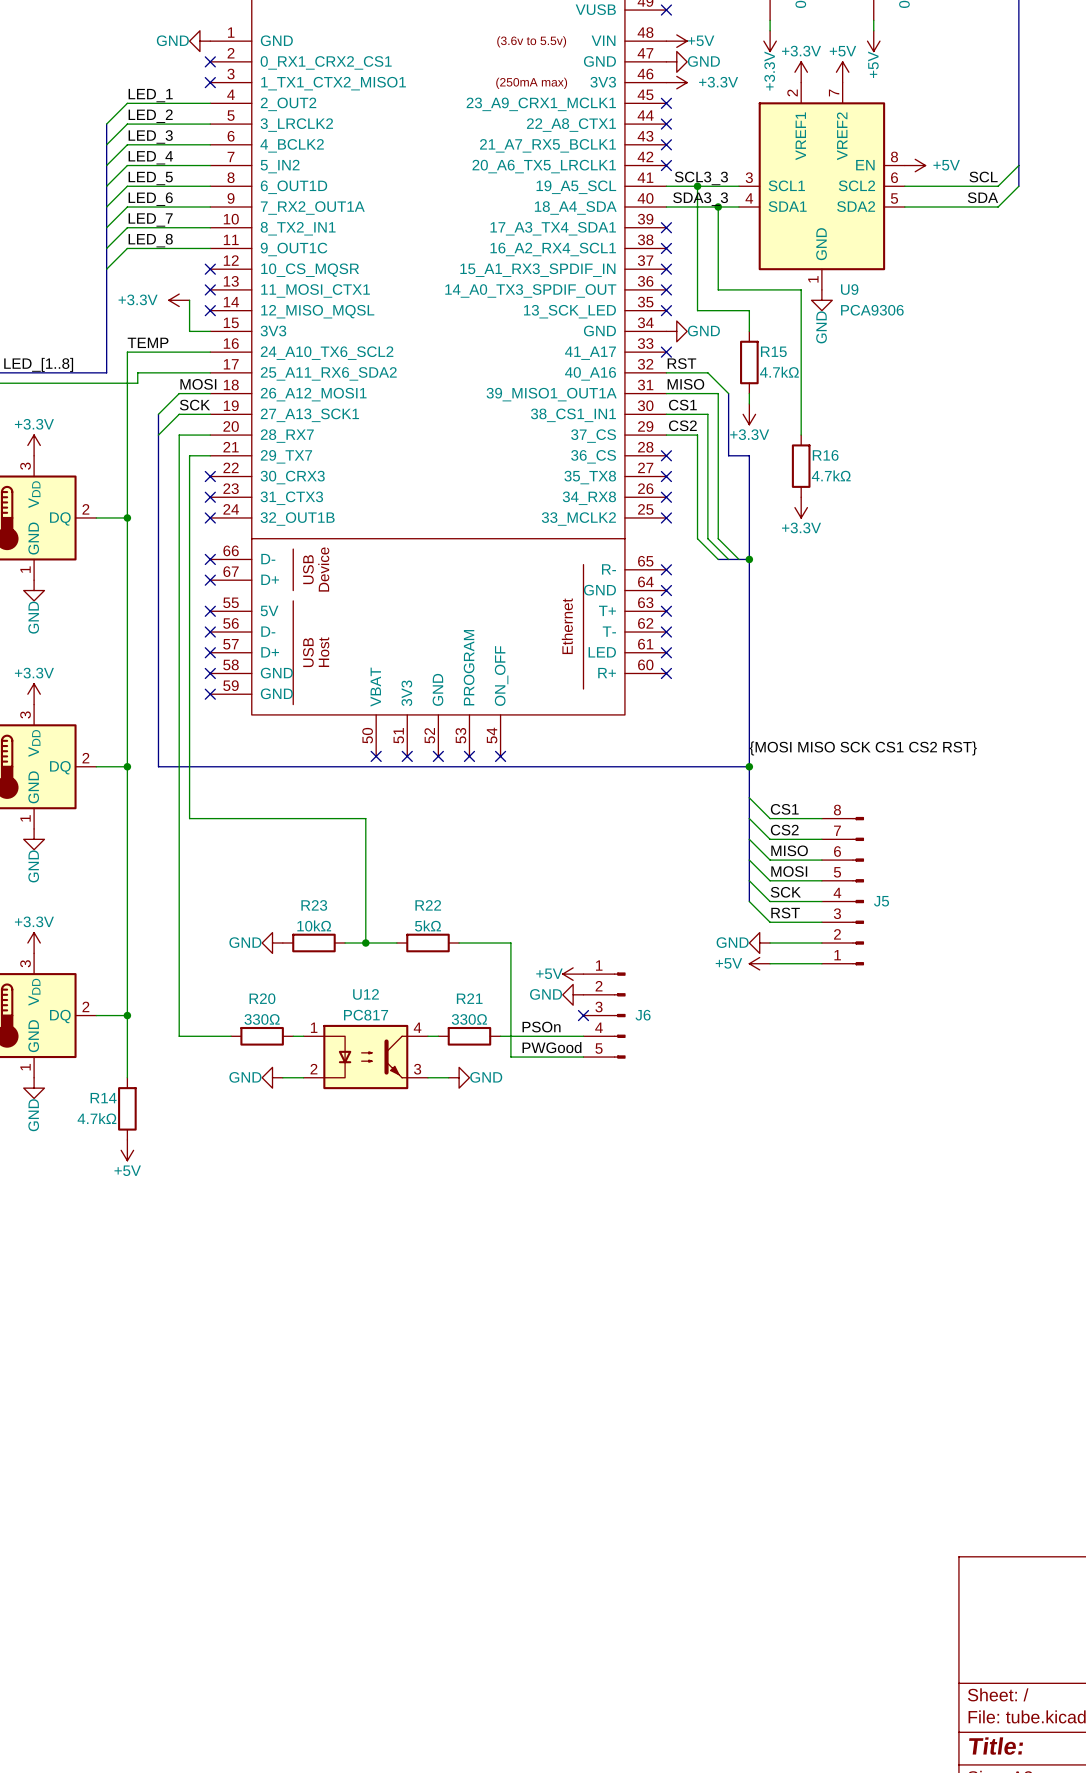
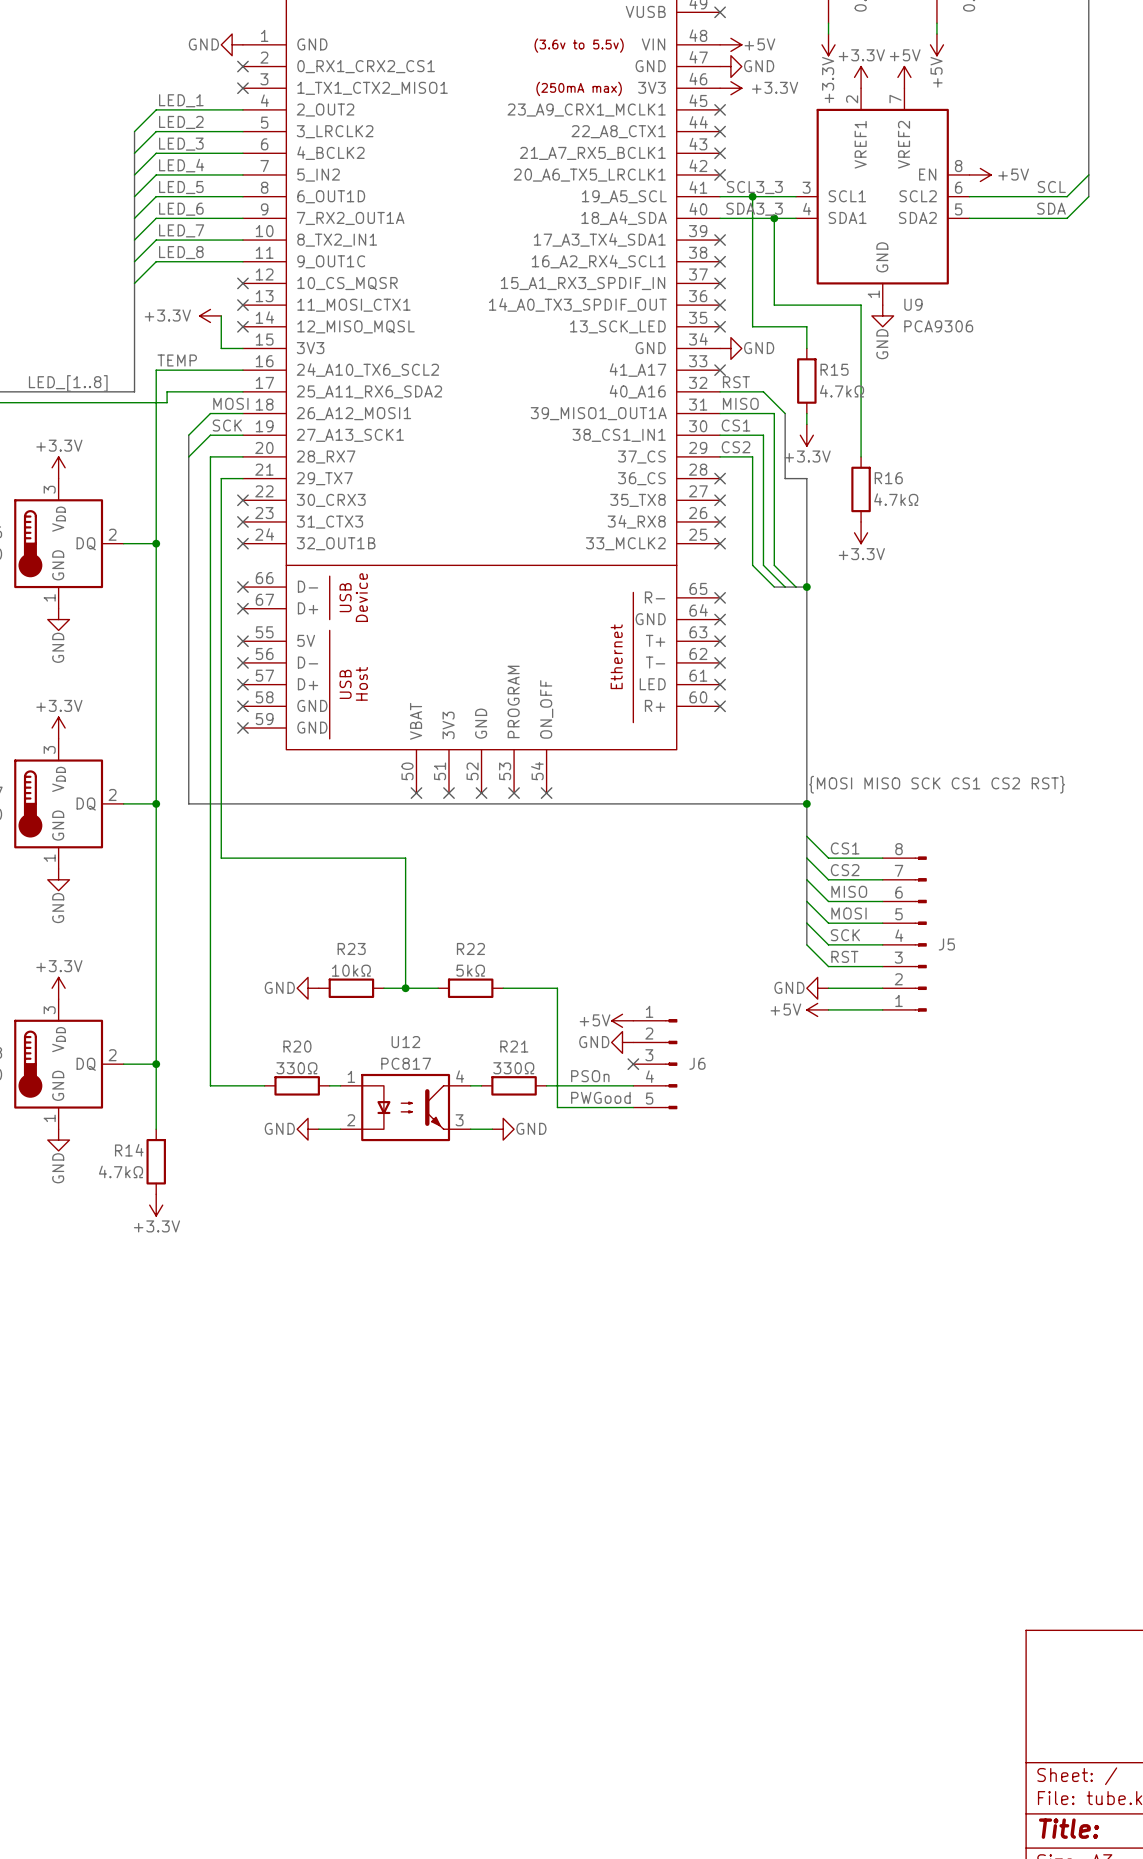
power symbol: +5V (127, 1150) -> +3.3V (156, 1205)

